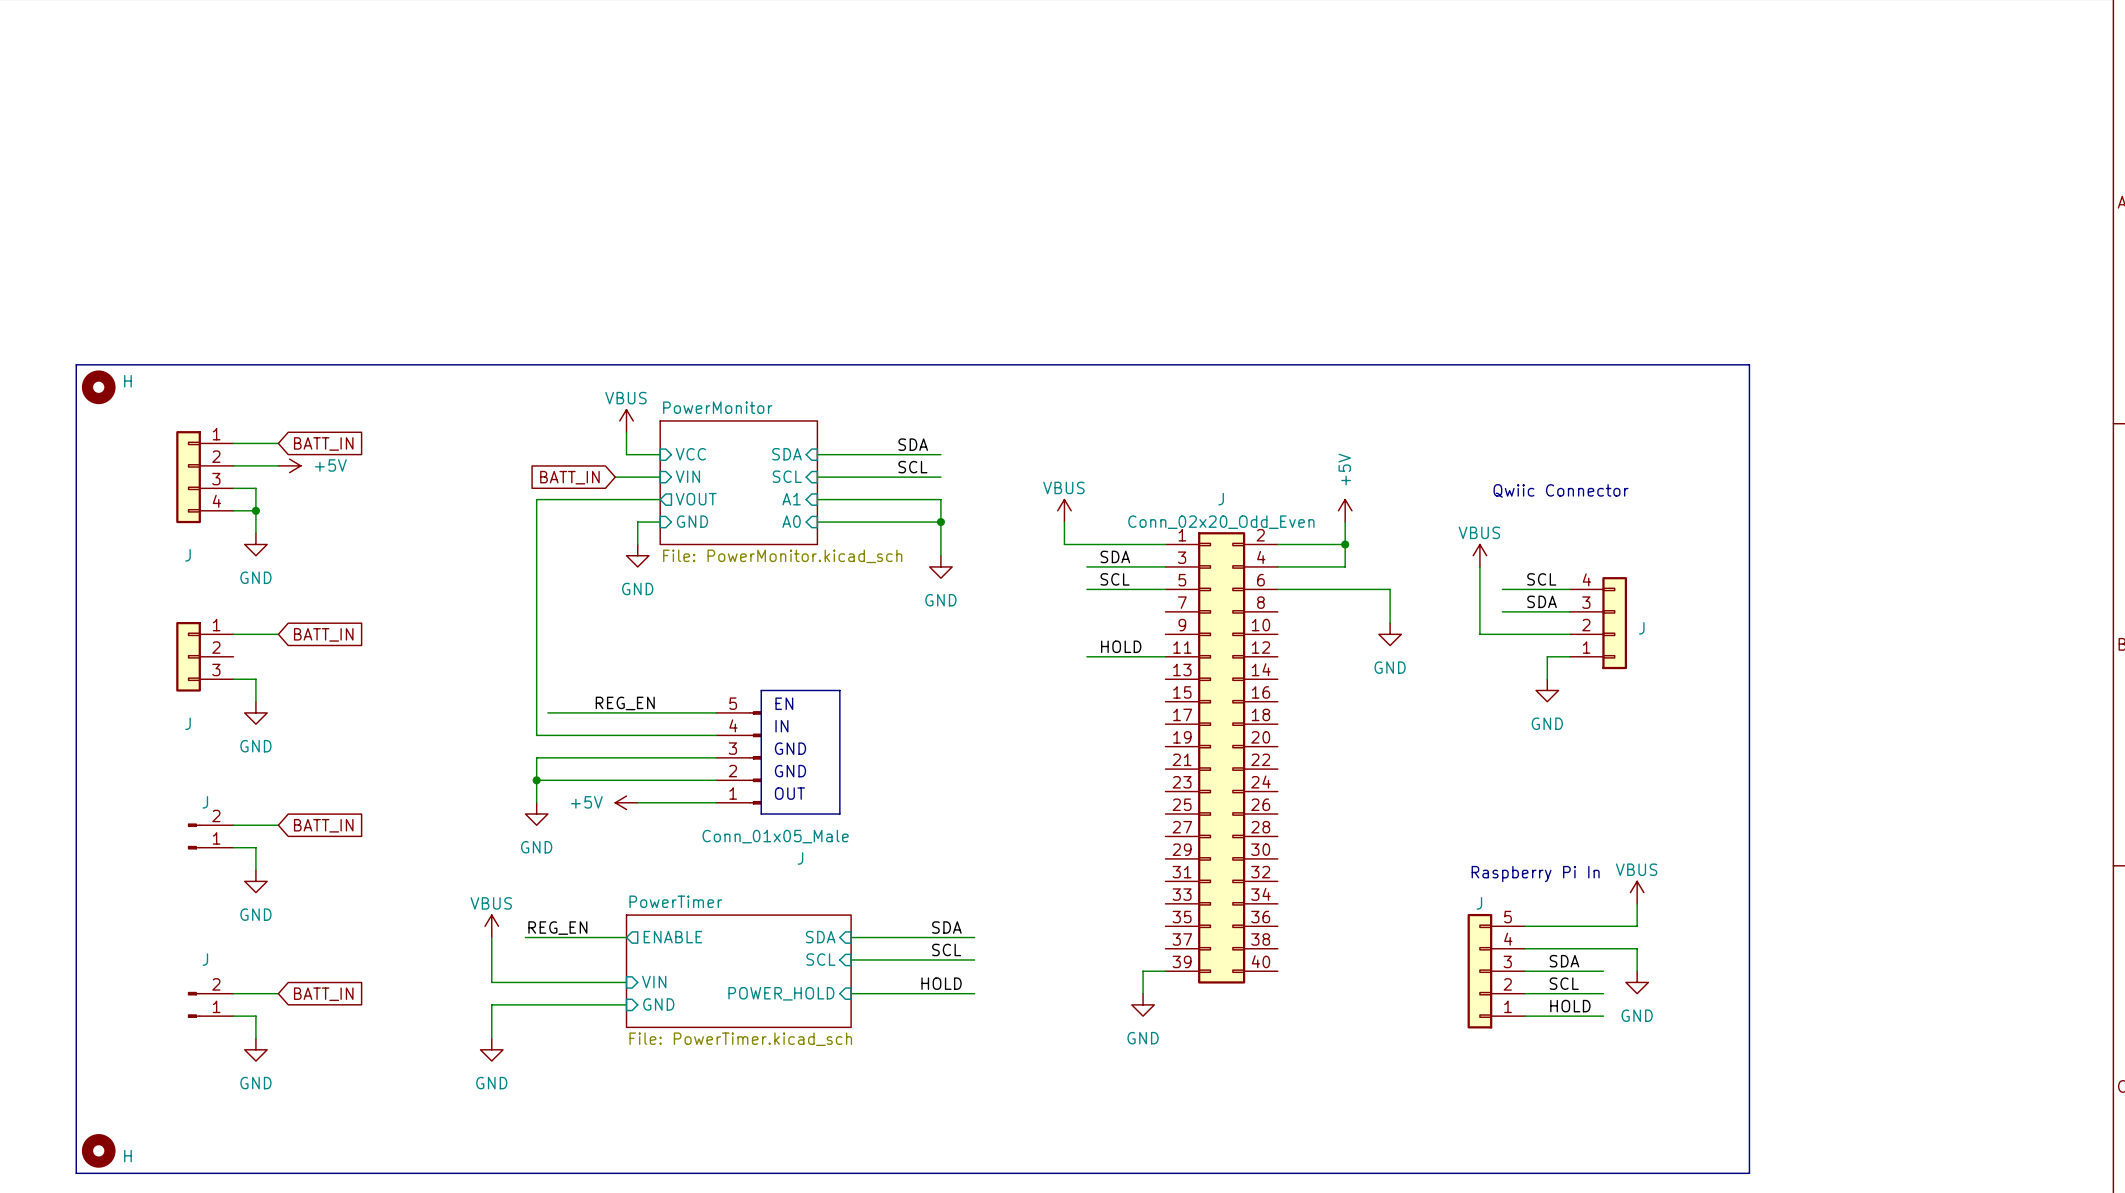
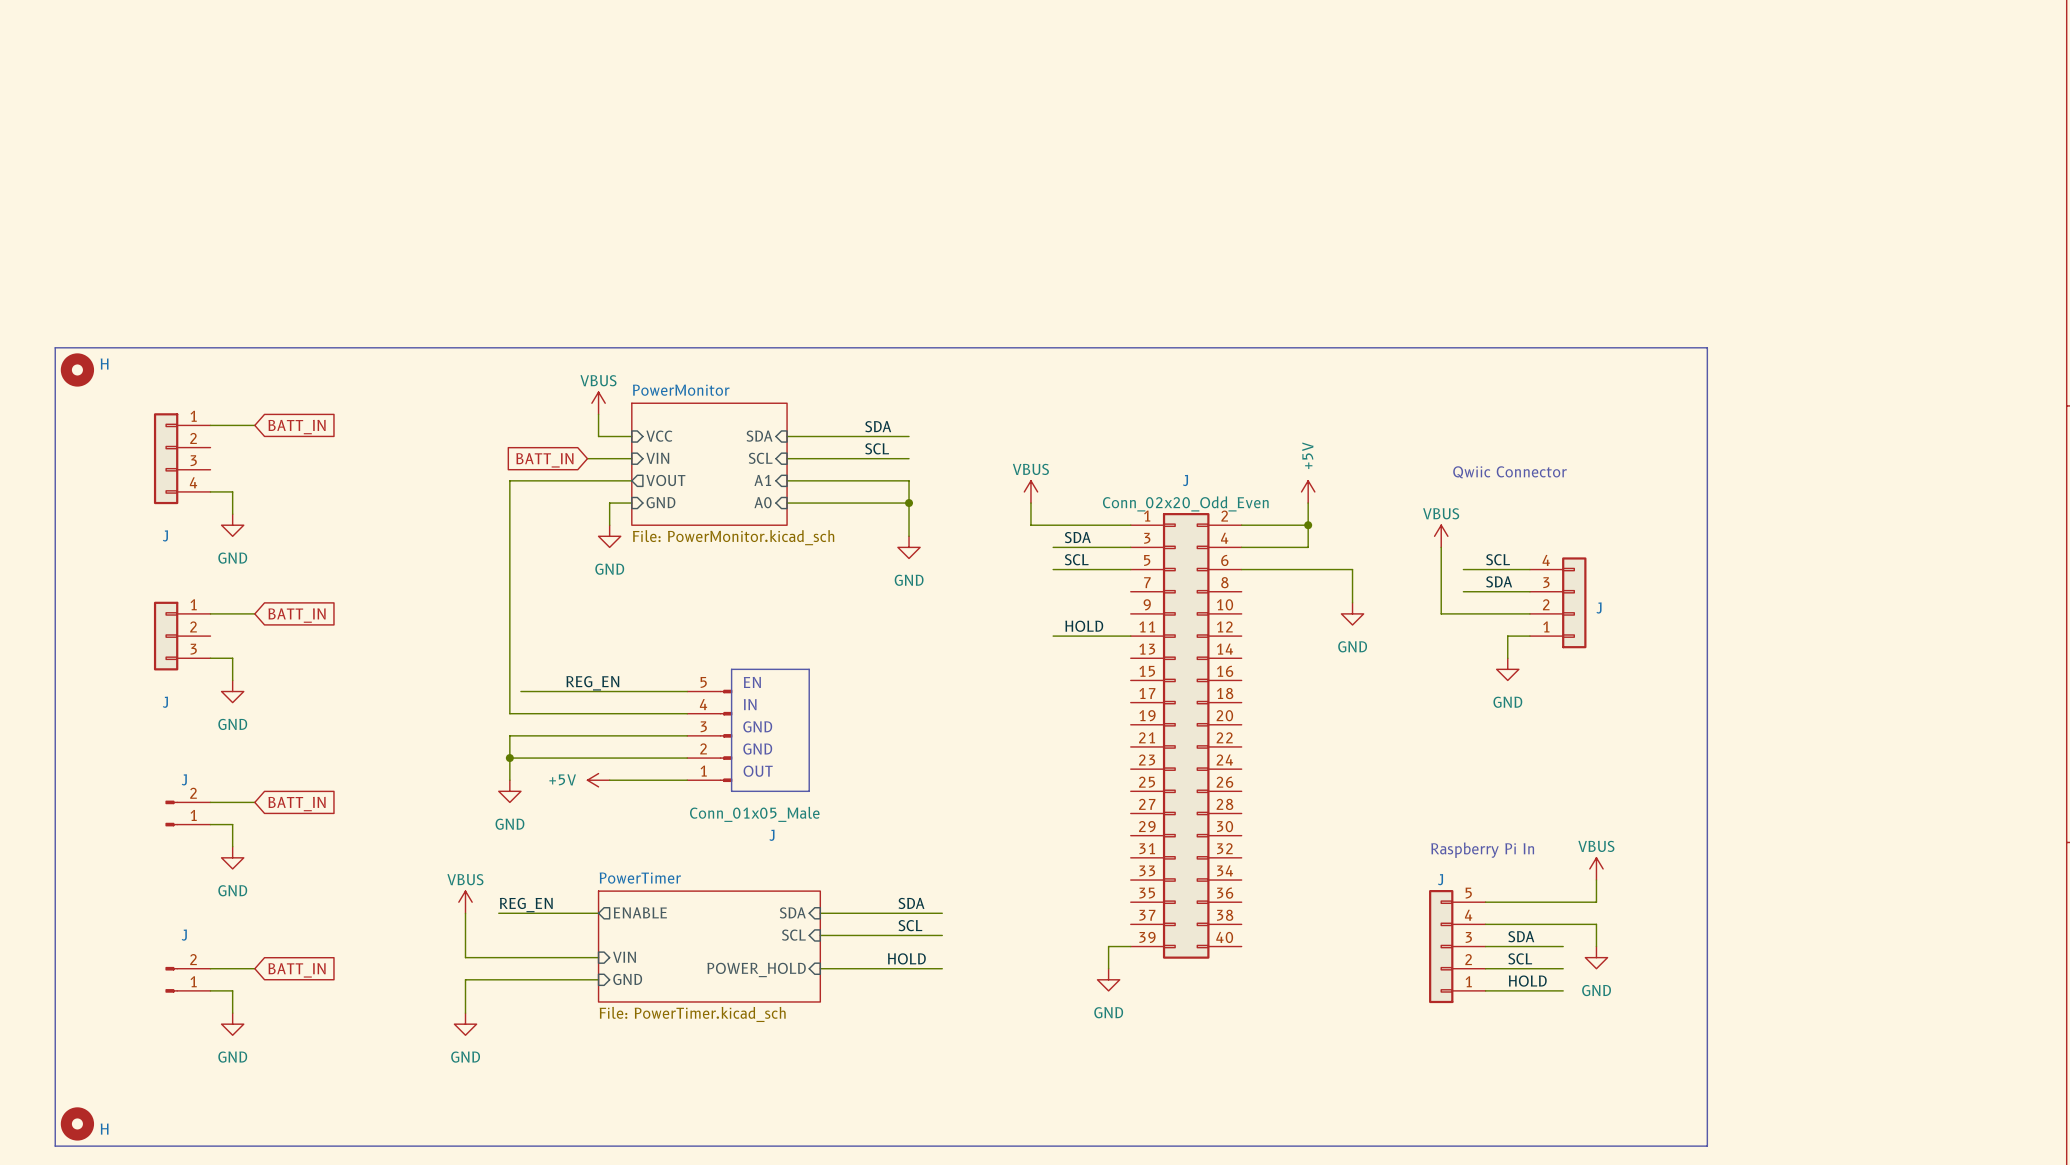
wire: (233, 465) (278, 465) -> none
power symbol: +5V (289, 465) -> none
wire: (233, 488) (255, 488) (255, 510) -> none
junction: (255, 510) -> none

